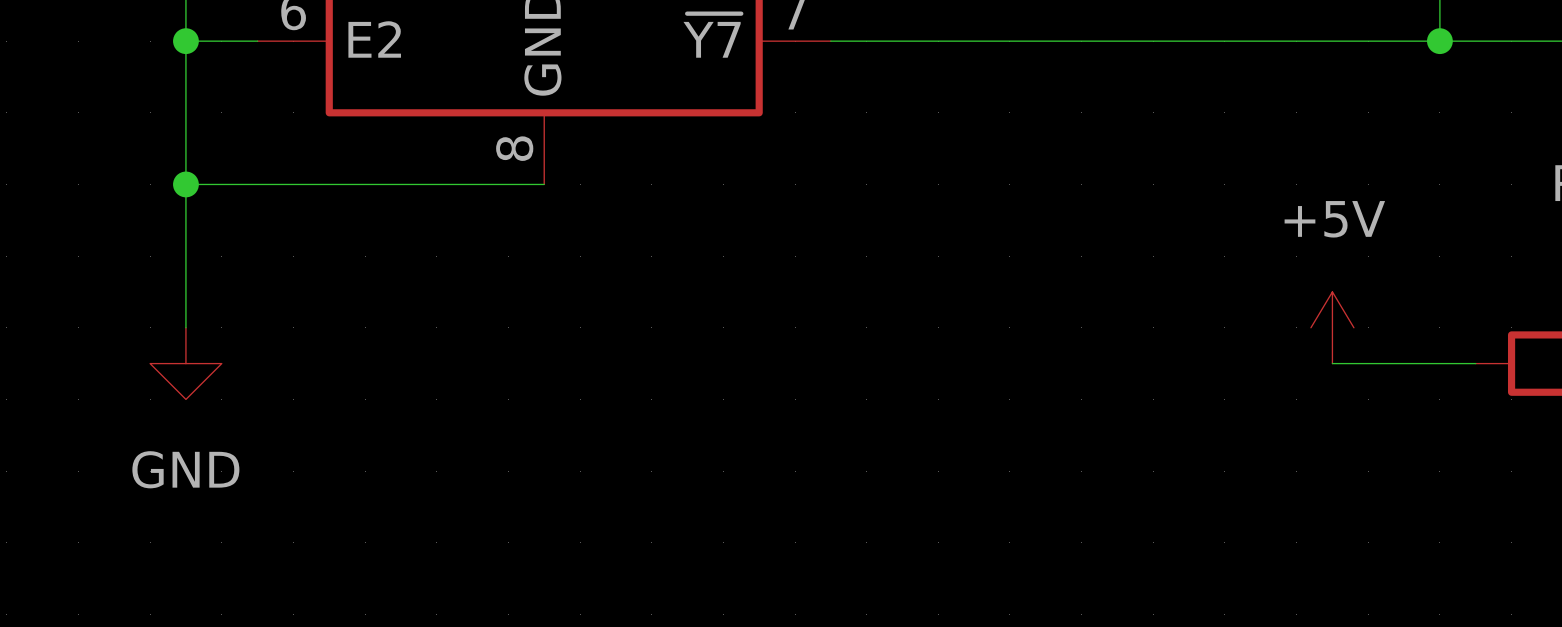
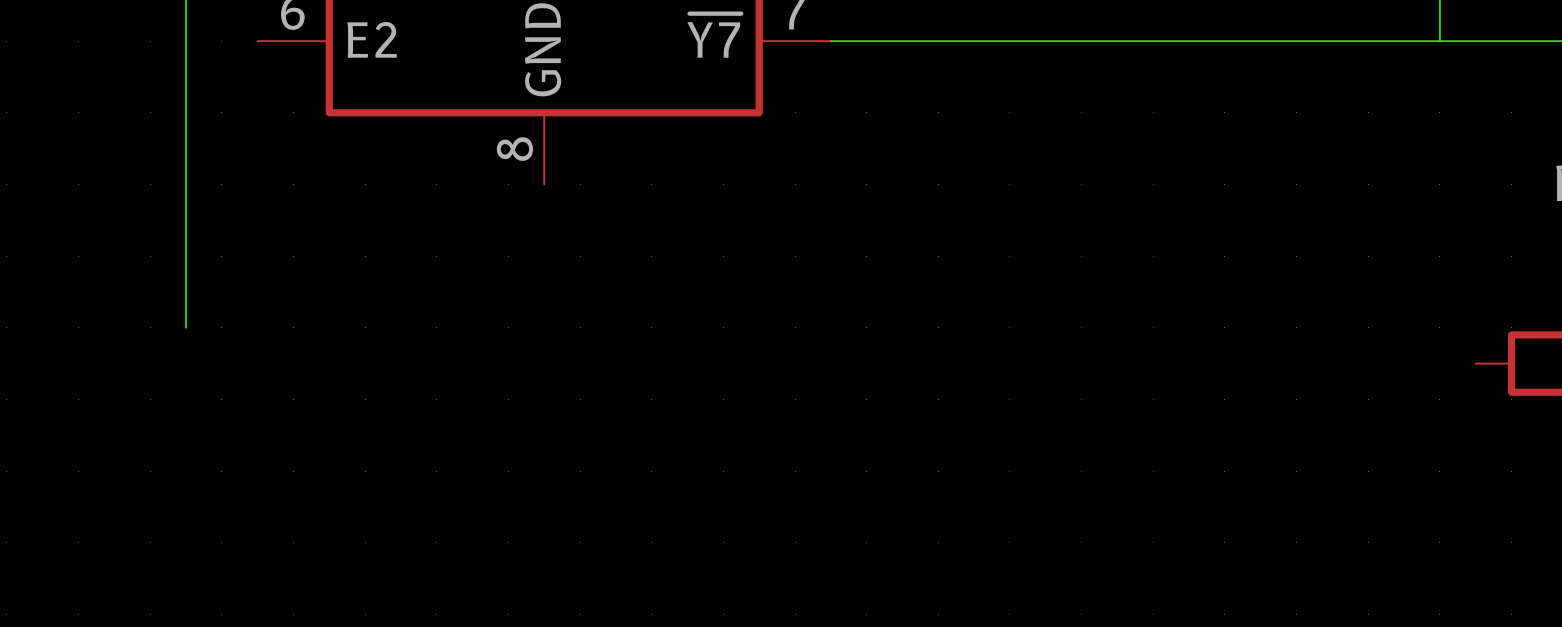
wire: (185, 41) (257, 41) -> none
junction: (185, 41) -> none
junction: (1439, 41) -> none
wire: (185, 184) (544, 184) -> none
junction: (185, 184) -> none
power symbol: +5V (1332, 327) -> none
power symbol: GND (185, 363) -> none
wire: (1332, 363) (1475, 363) -> none

